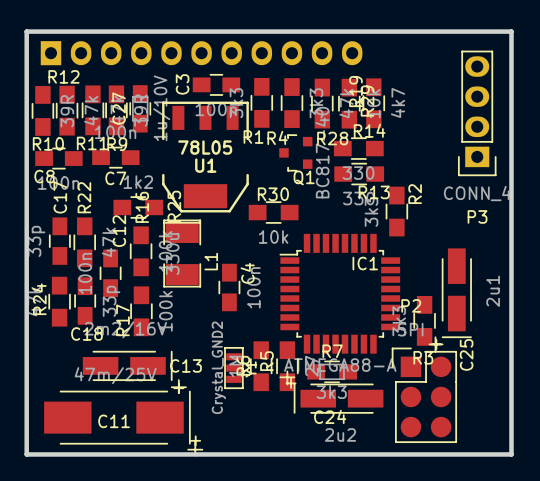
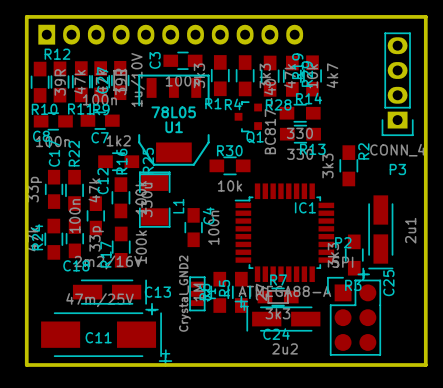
R2 position: (396, 211) -> (348, 165)

